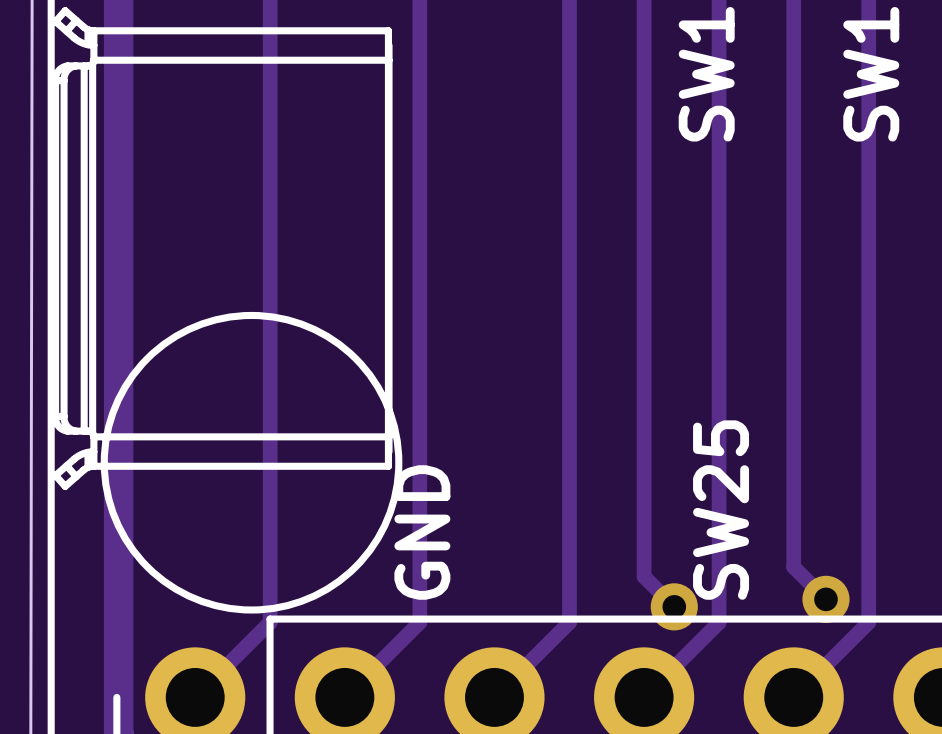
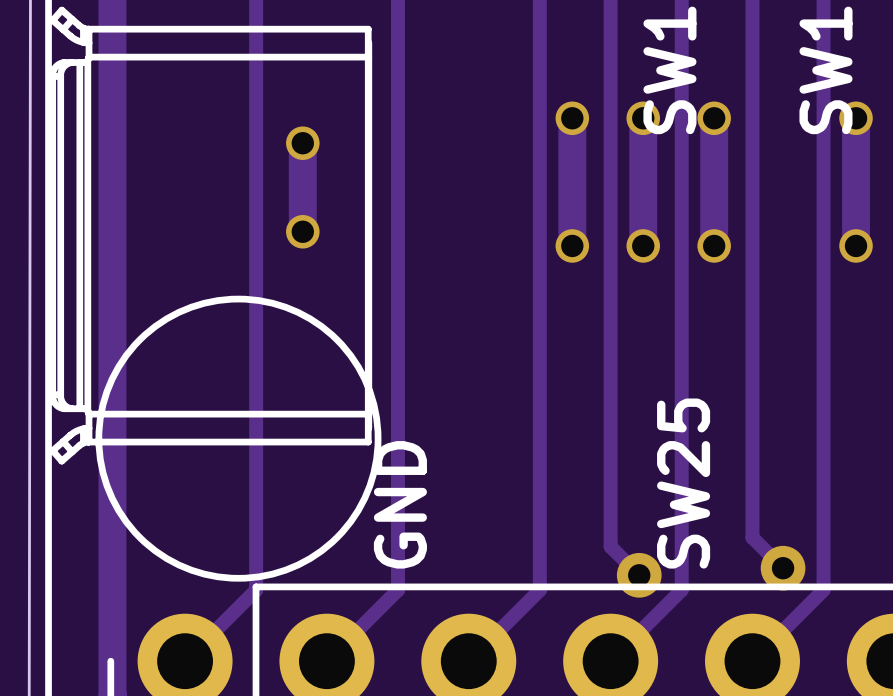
track: none -> (572, 118) (572, 245)
via: none -> (572, 118)
track: none -> (643, 118) (643, 245)
via: none -> (643, 118)
track: none -> (714, 118) (714, 245)
via: none -> (714, 118)
track: none -> (856, 118) (856, 245)
via: none -> (856, 118)
track: none -> (302, 143) (302, 231)
via: none -> (302, 143)
via: none -> (302, 231)
via: none -> (572, 245)
via: none -> (643, 245)
via: none -> (714, 245)
via: none -> (856, 245)

